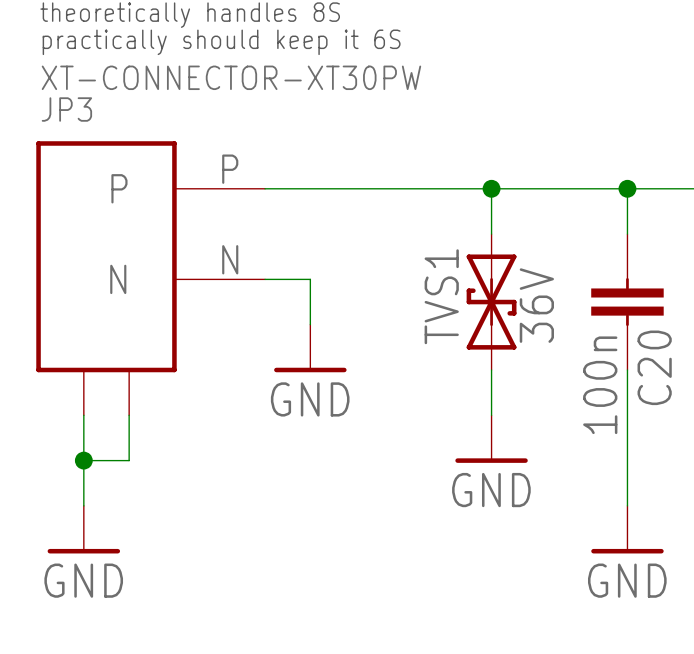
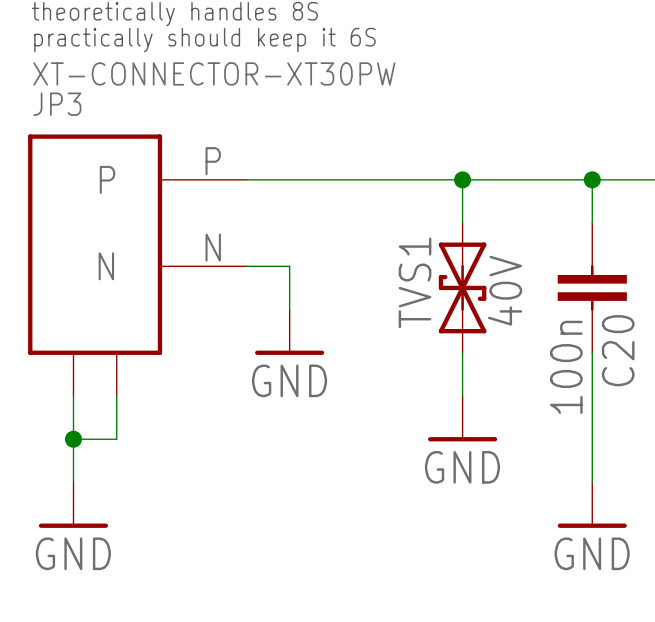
TVS1 value: 36V (536, 305) -> 40V (505, 290)

